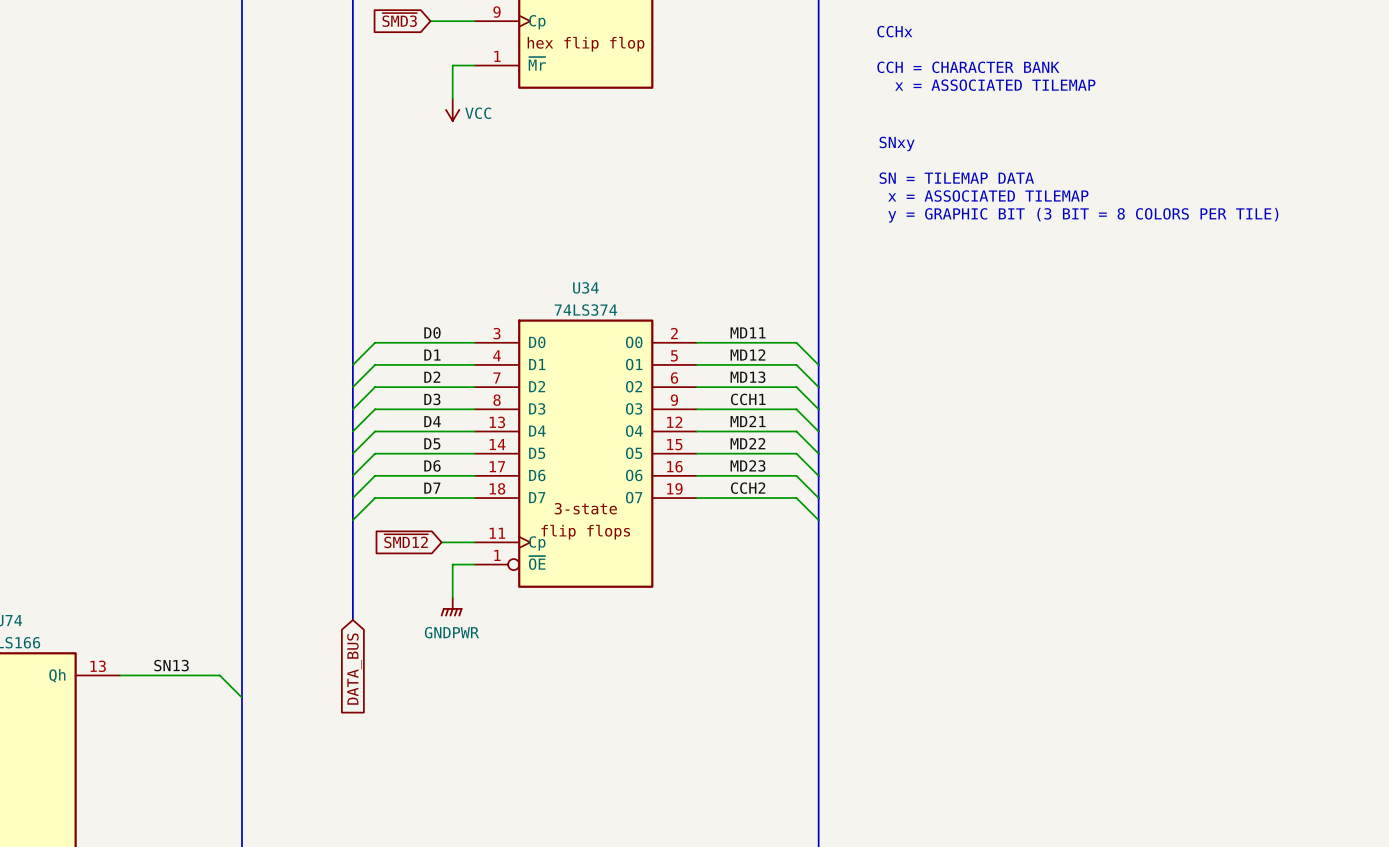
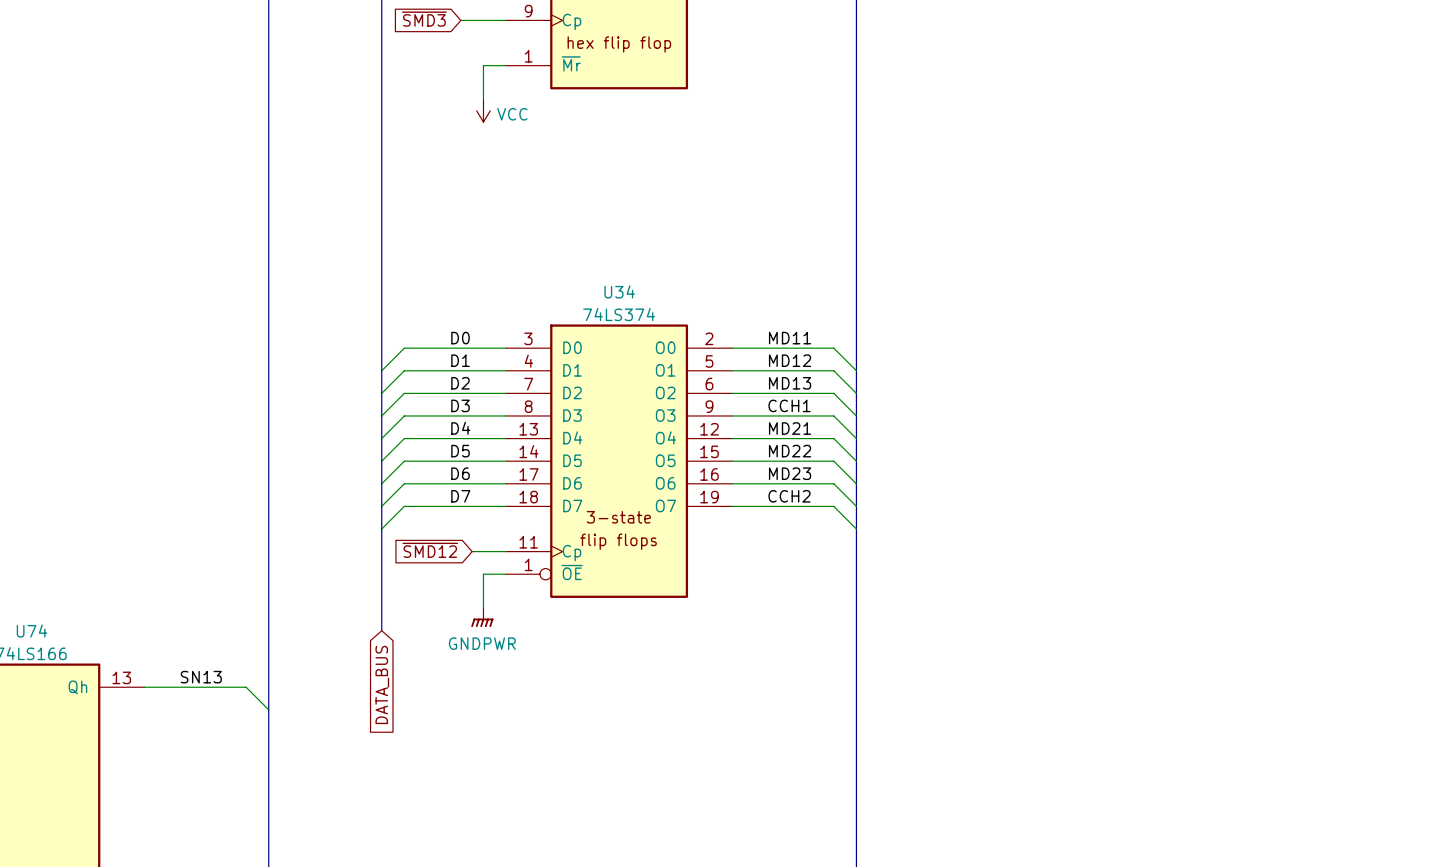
text: CCHx (894, 31) -> none
text: CCH = CHARACTER BANK (968, 67) -> none
text: x = ASSOCIATED TILEMAP (995, 85) -> none
text: SNxy (897, 143) -> none
text: SN = TILEMAP DATA (956, 178) -> none
text: x = ASSOCIATED TILEMAP (988, 196) -> none
text: y = GRAPHIC BIT (3 BIT = 8 COLORS PER TILE) (1083, 215) -> none

